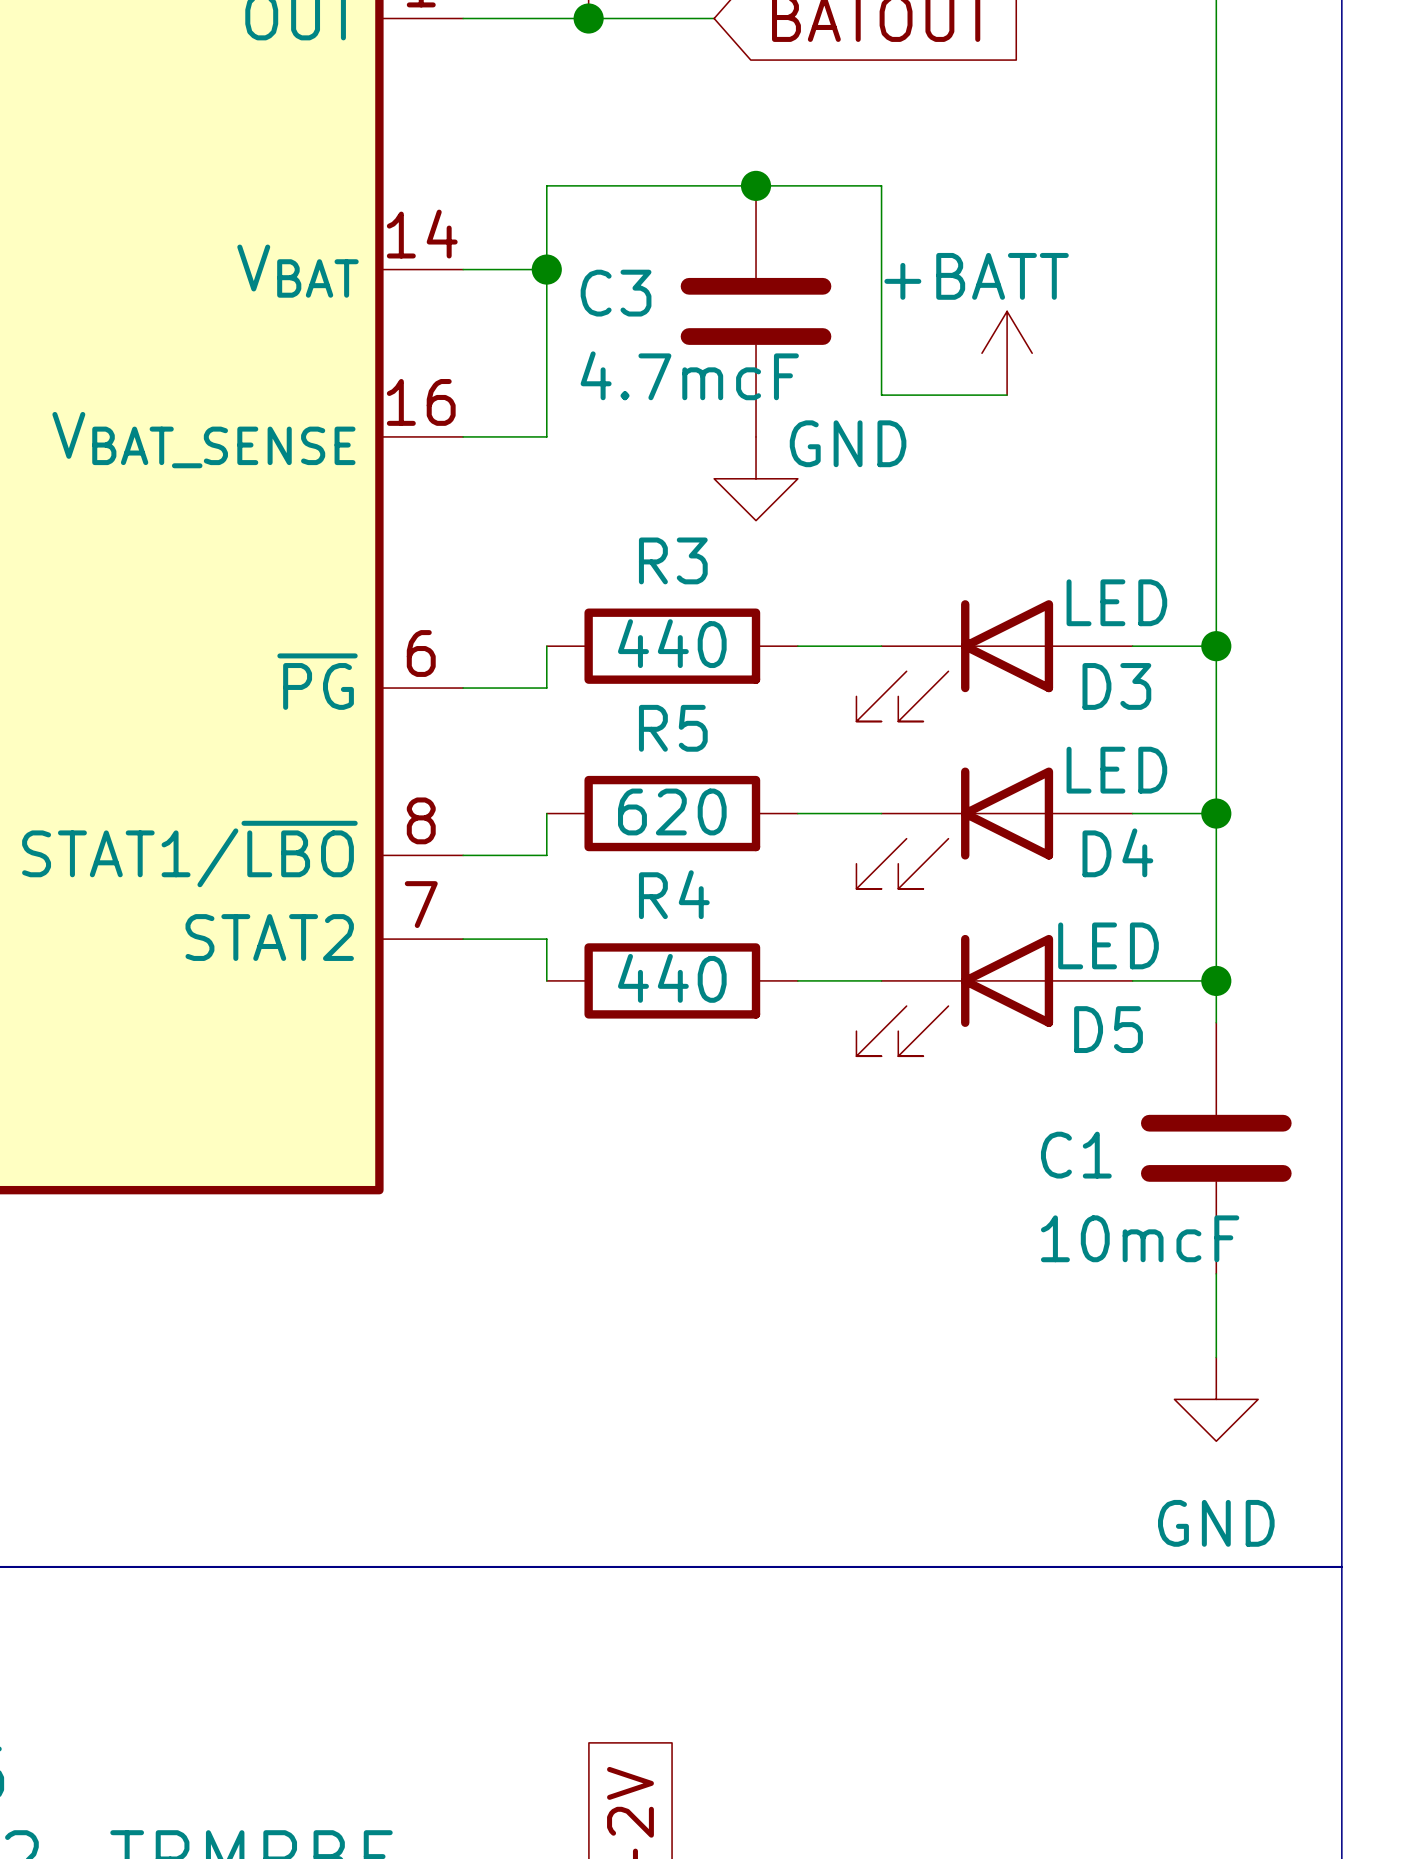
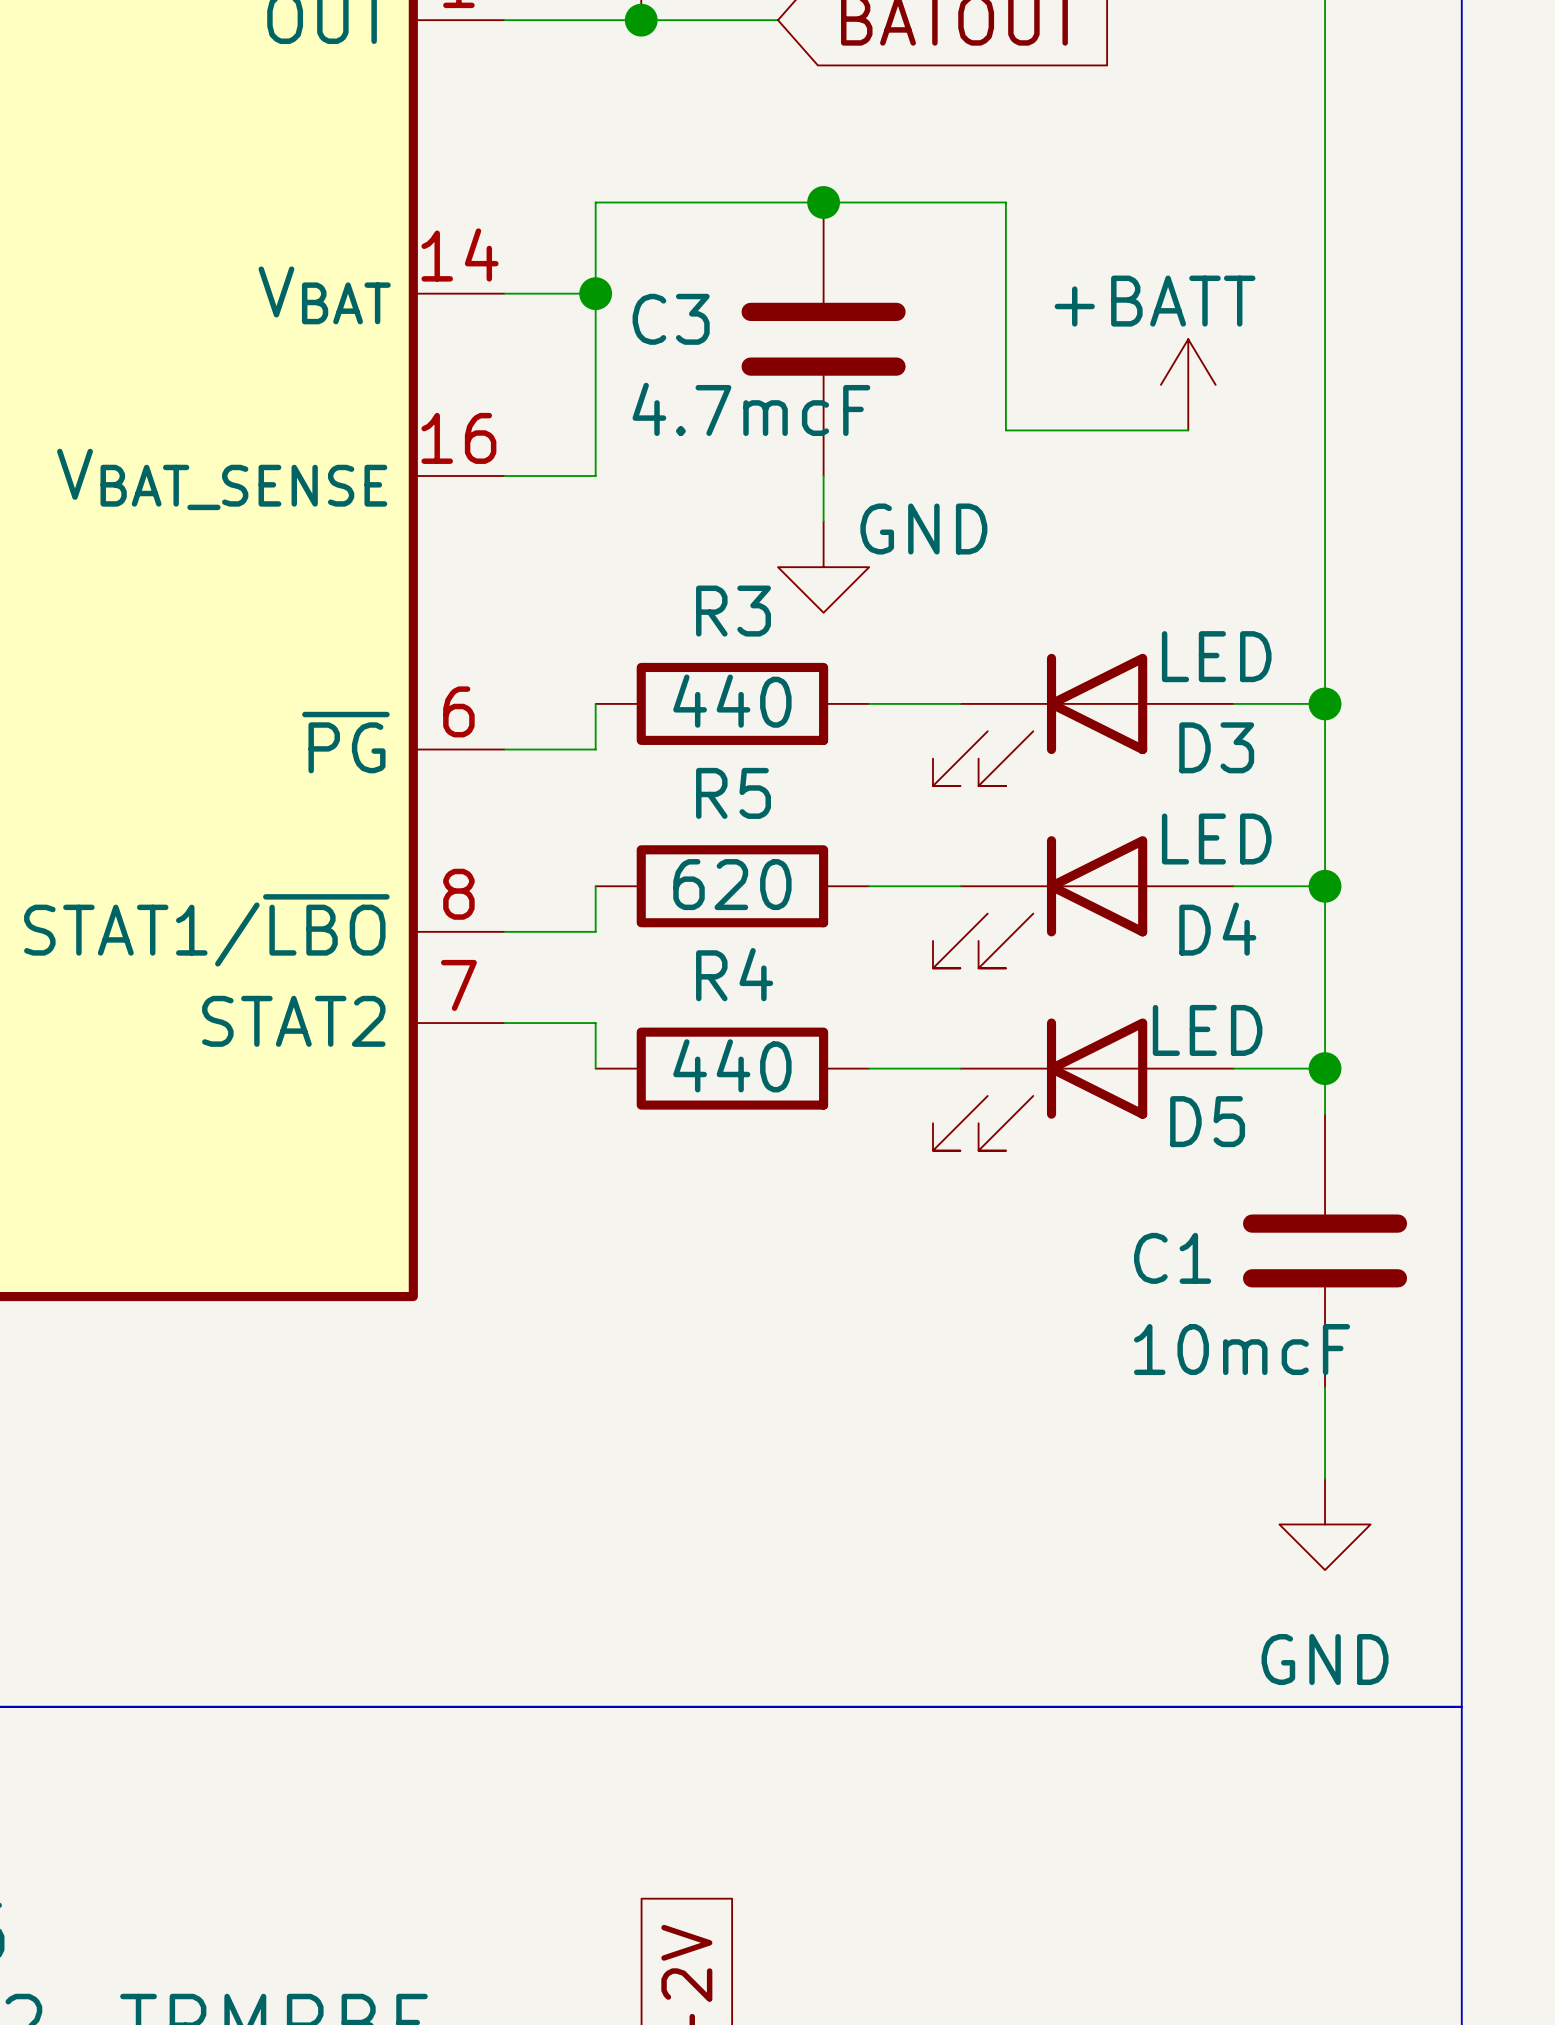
wire: (881, 185) (881, 395) (923, 395) -> (960, 202) (1005, 202) (1005, 430)
power symbol position: +BATT (1007, 353) -> +BATT (1188, 384)
wire: none -> (1097, 430) (1188, 430)
power symbol position: GND (756, 478) -> GND (823, 567)

